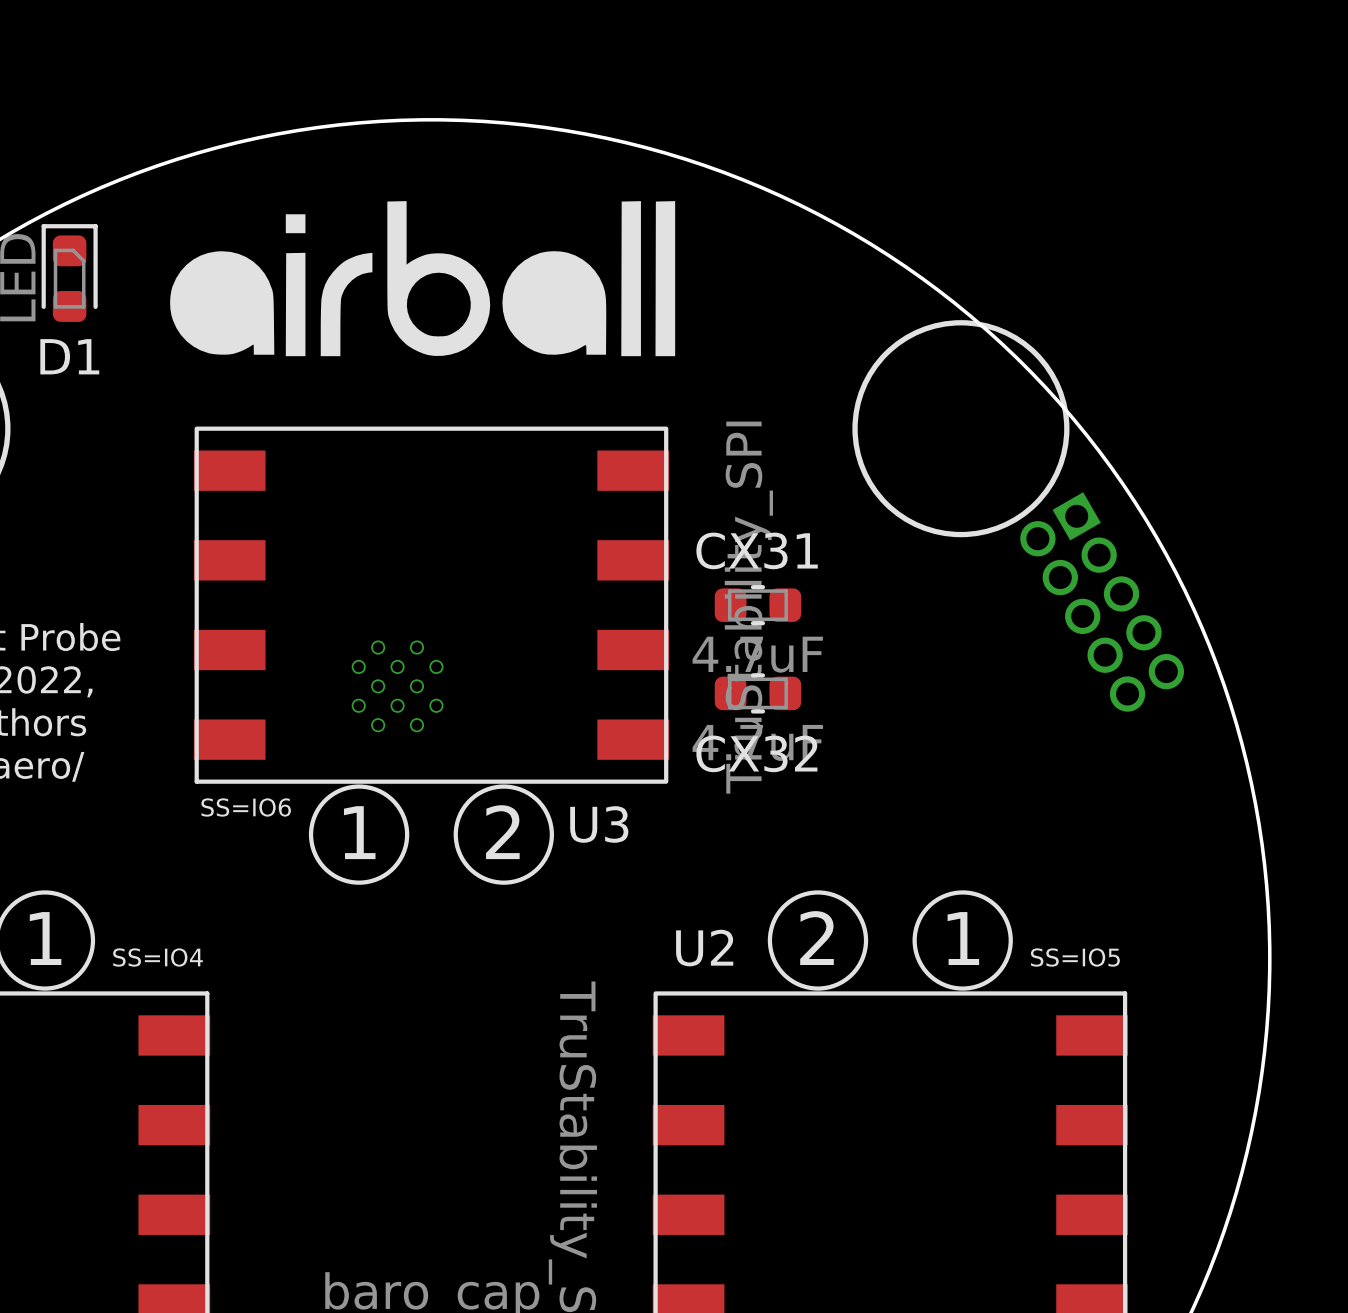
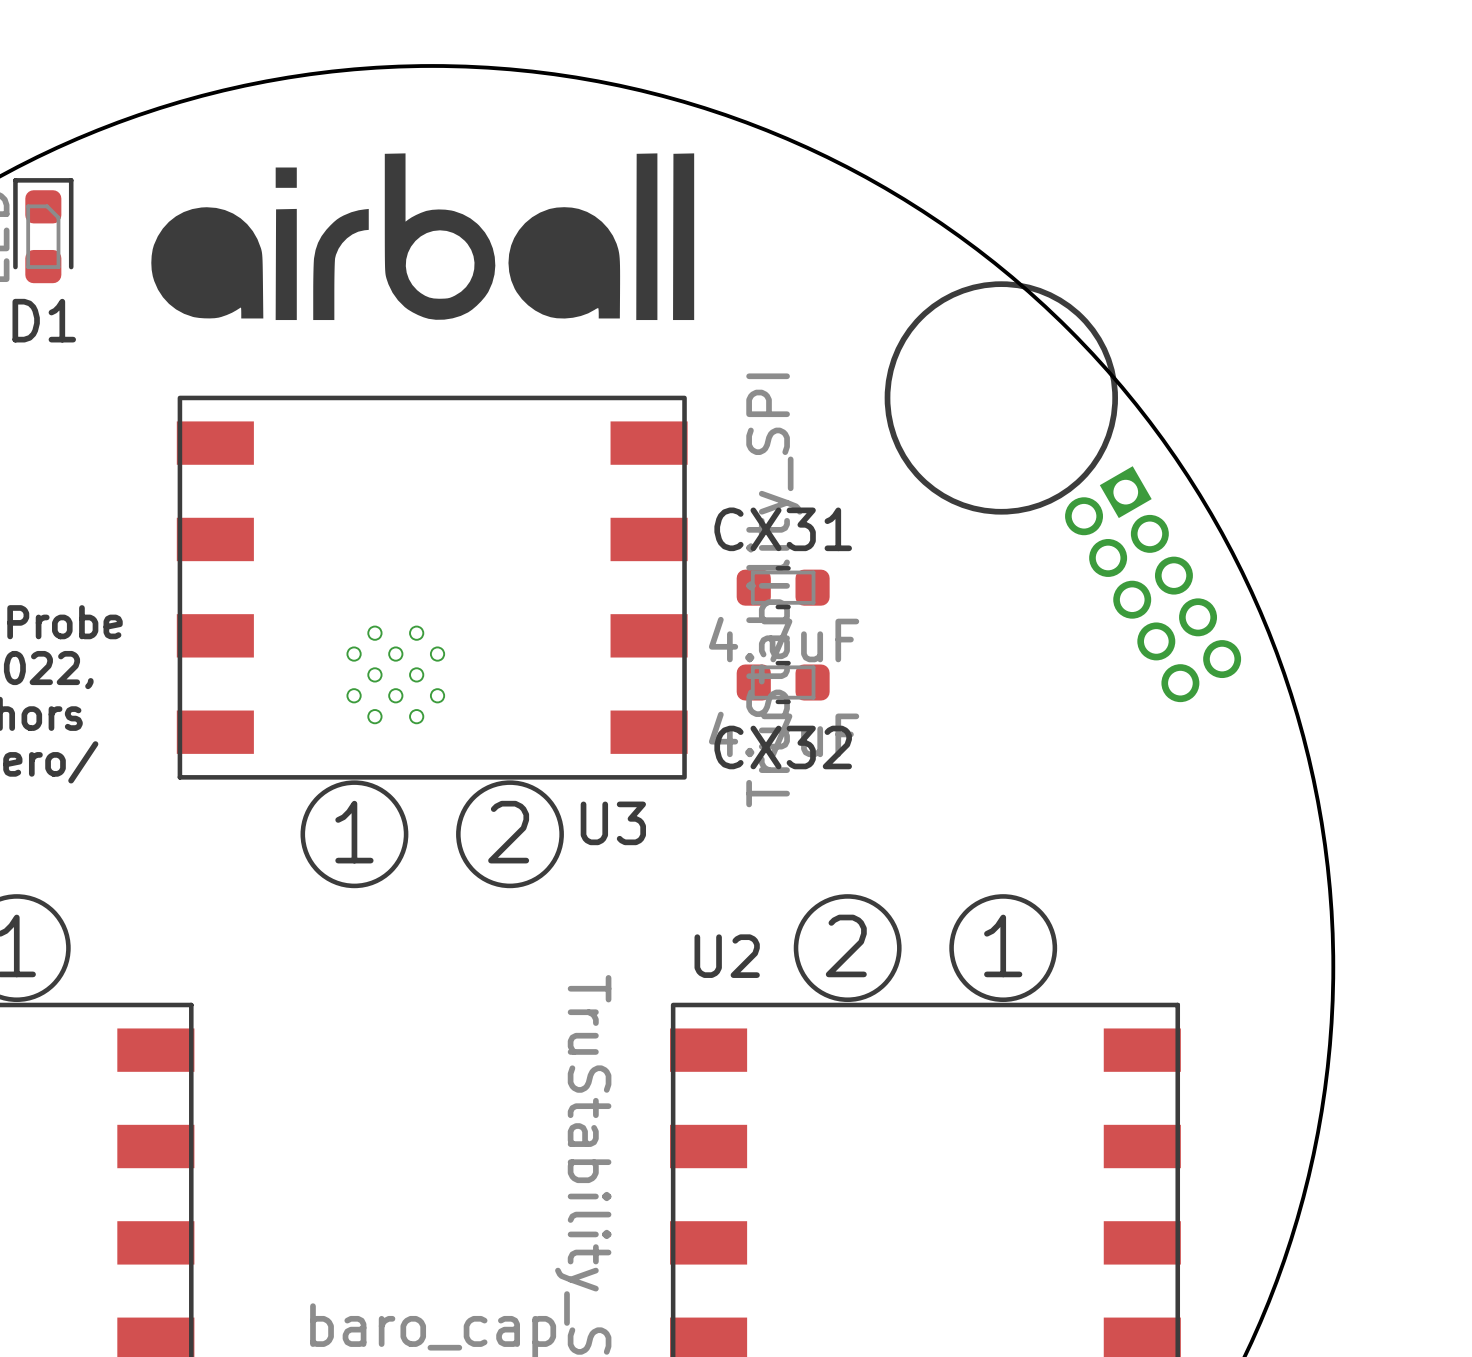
text: SS=IO6 (246, 807) -> none
text: SS=IO4 (158, 957) -> none
text: SS=IO5 (1075, 957) -> none

